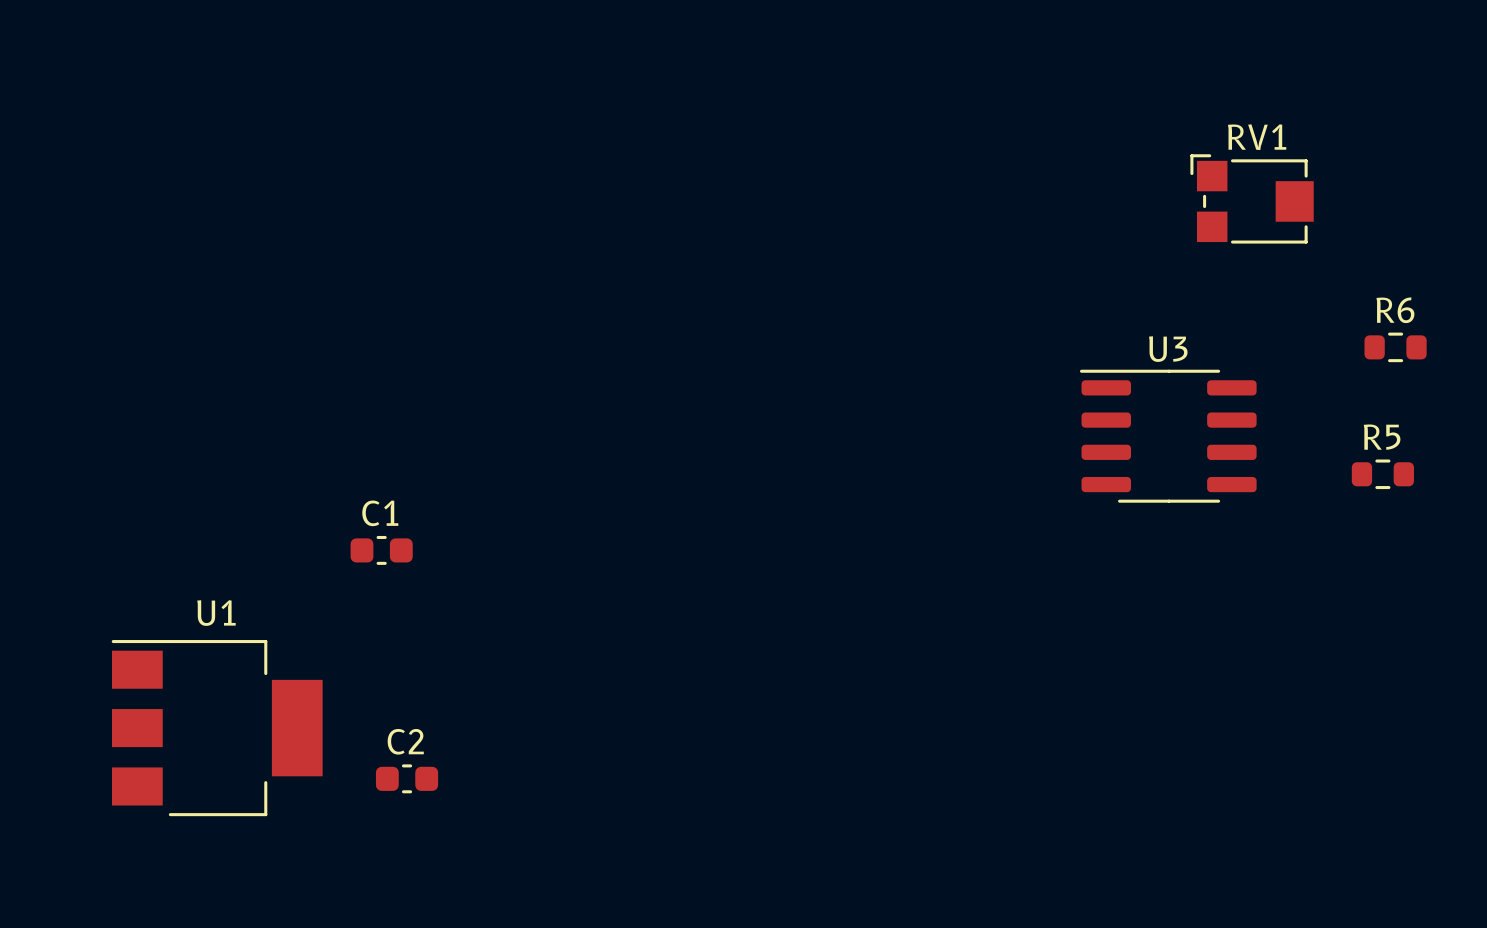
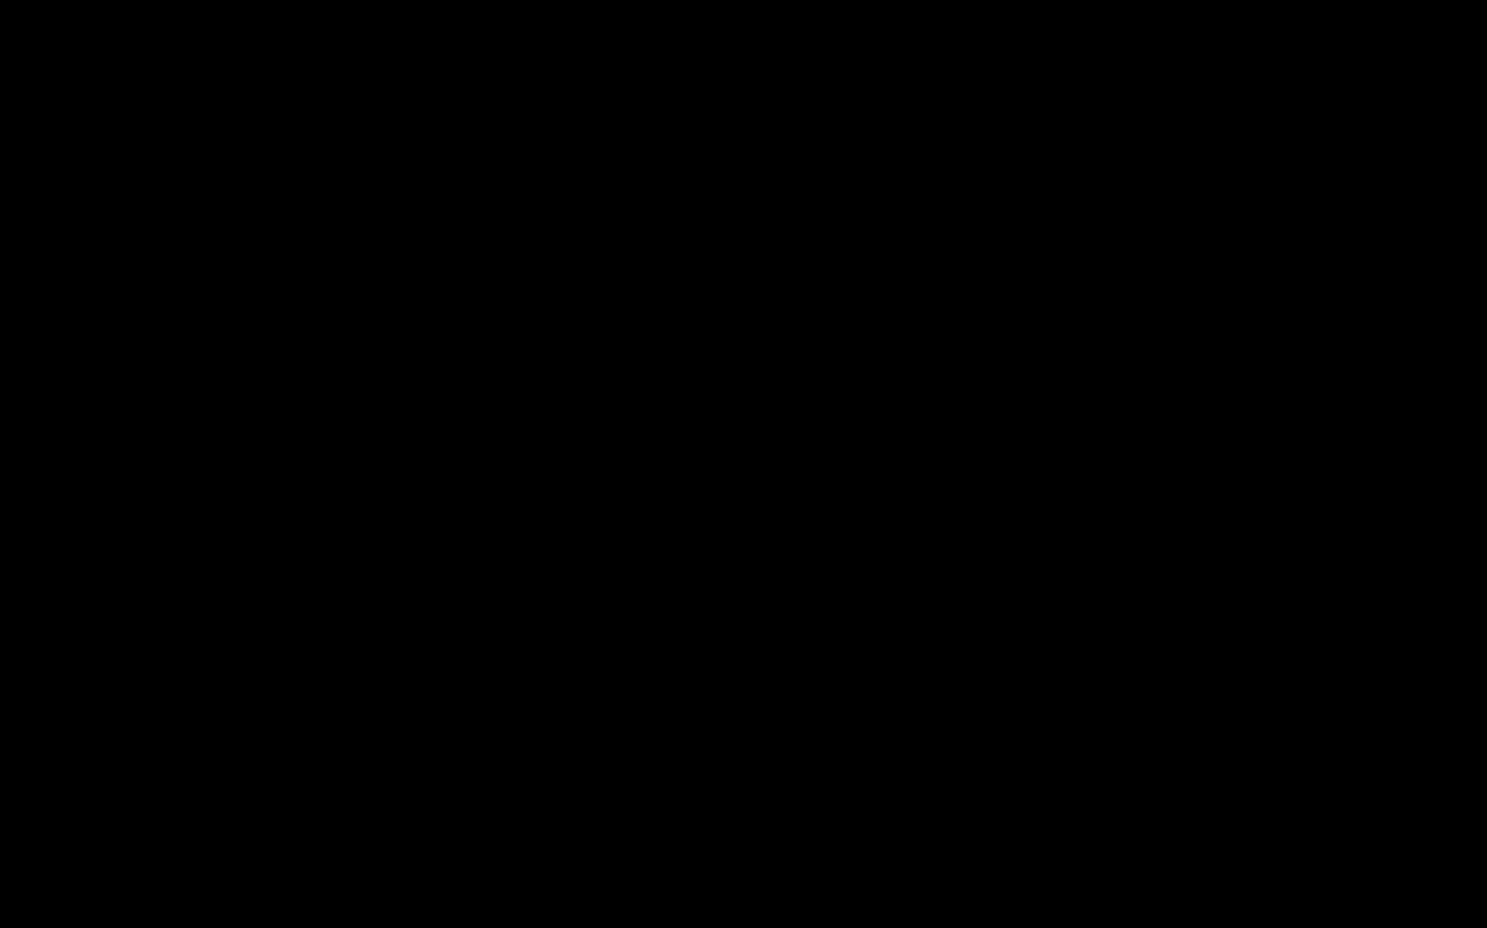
RV1: (1252, 198) -> none
R6: (1395, 347) -> none
U3: (1168, 436) -> none
R5: (1382, 474) -> none
C1: (381, 550) -> none
U1: (217, 728) -> none
C2: (407, 778) -> none

